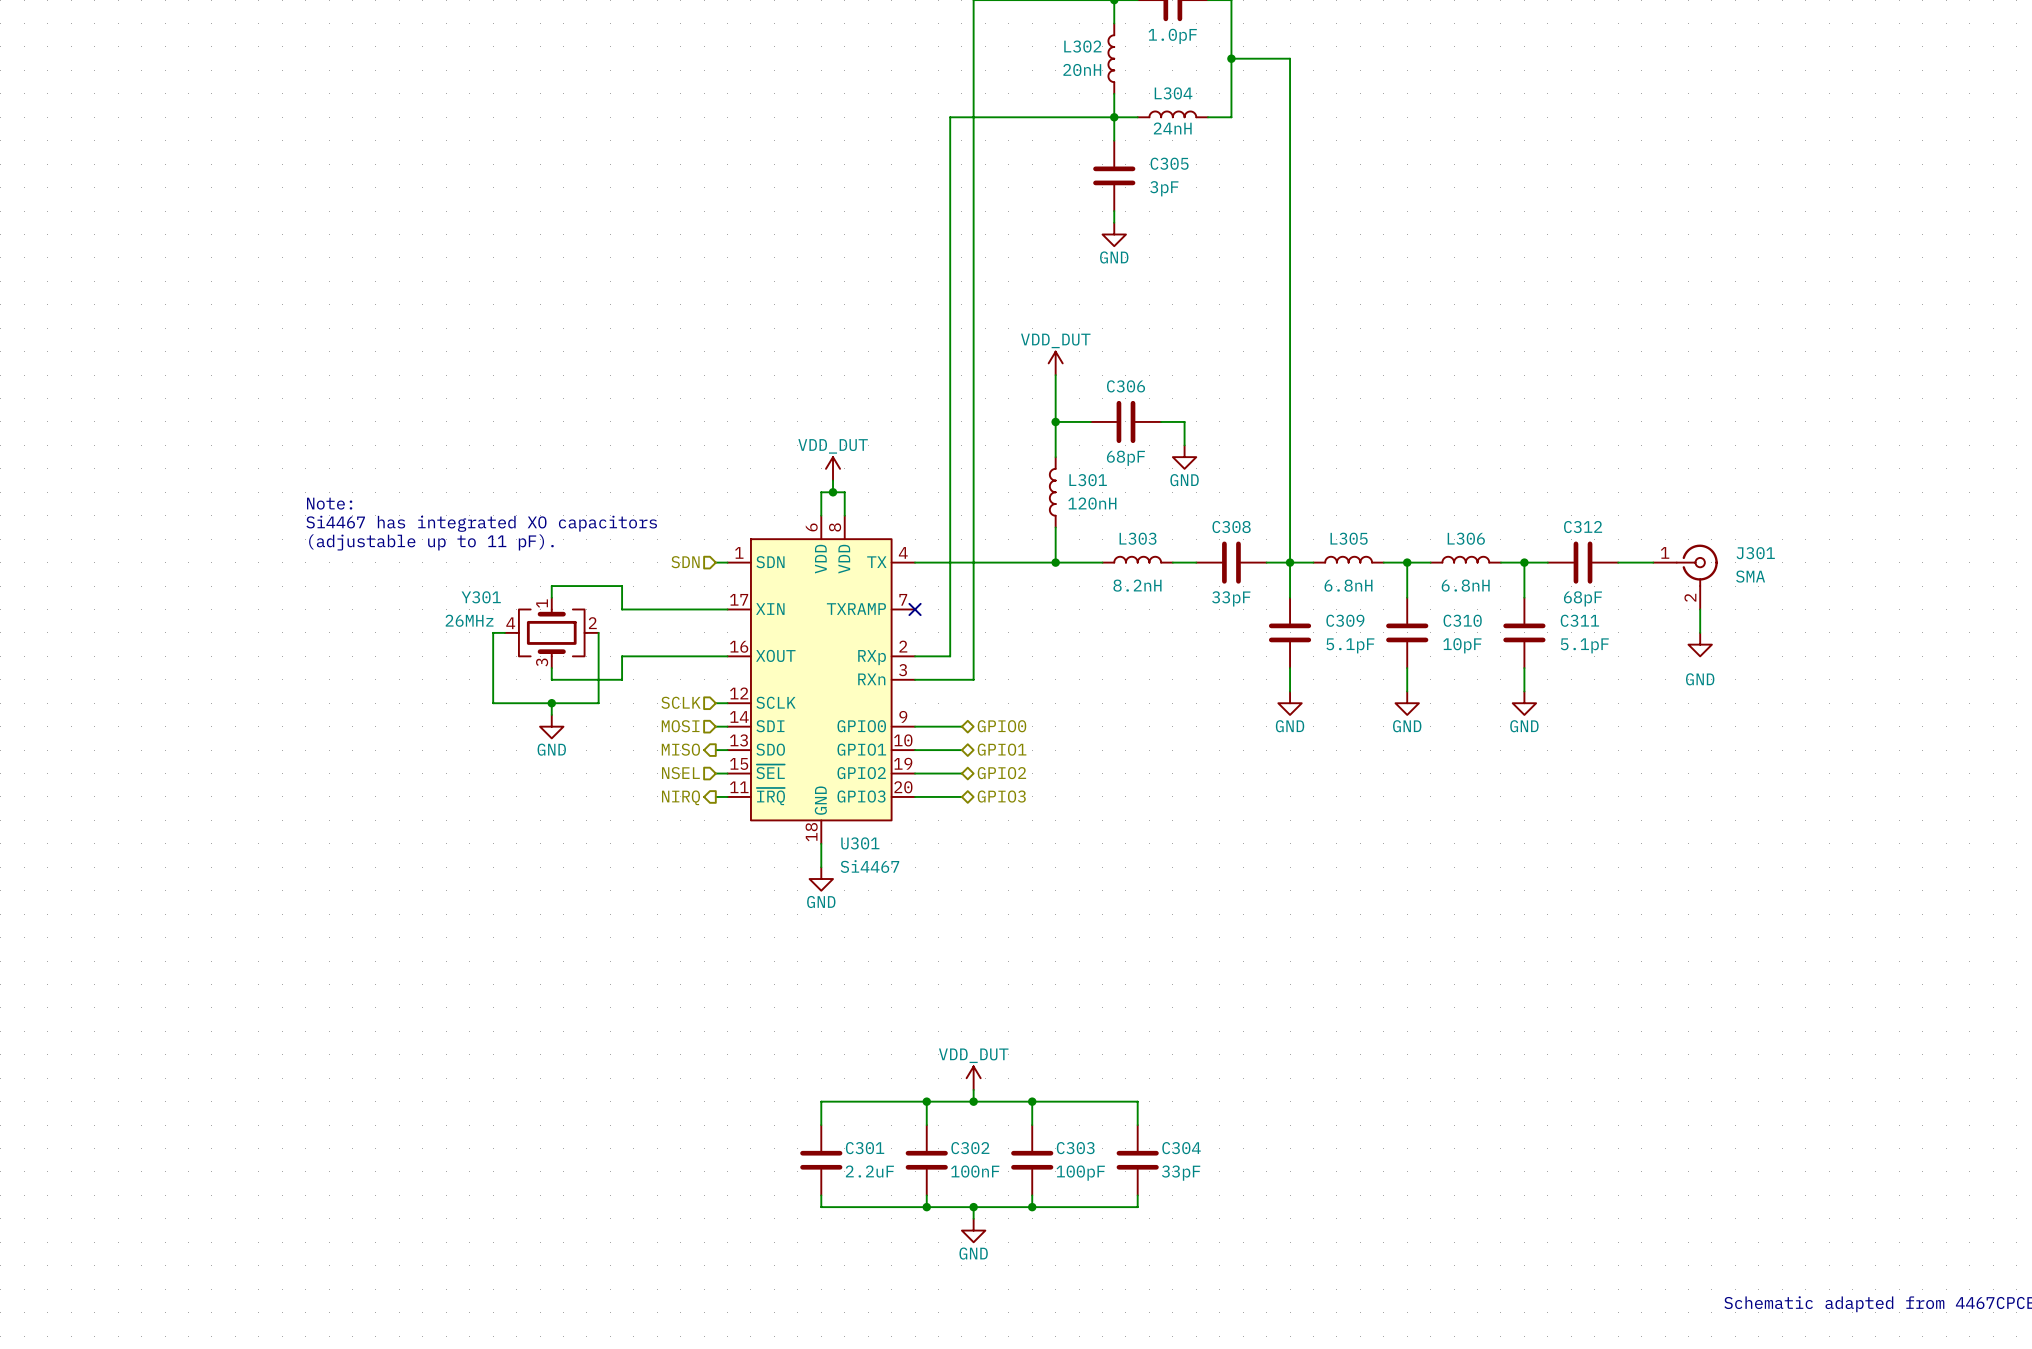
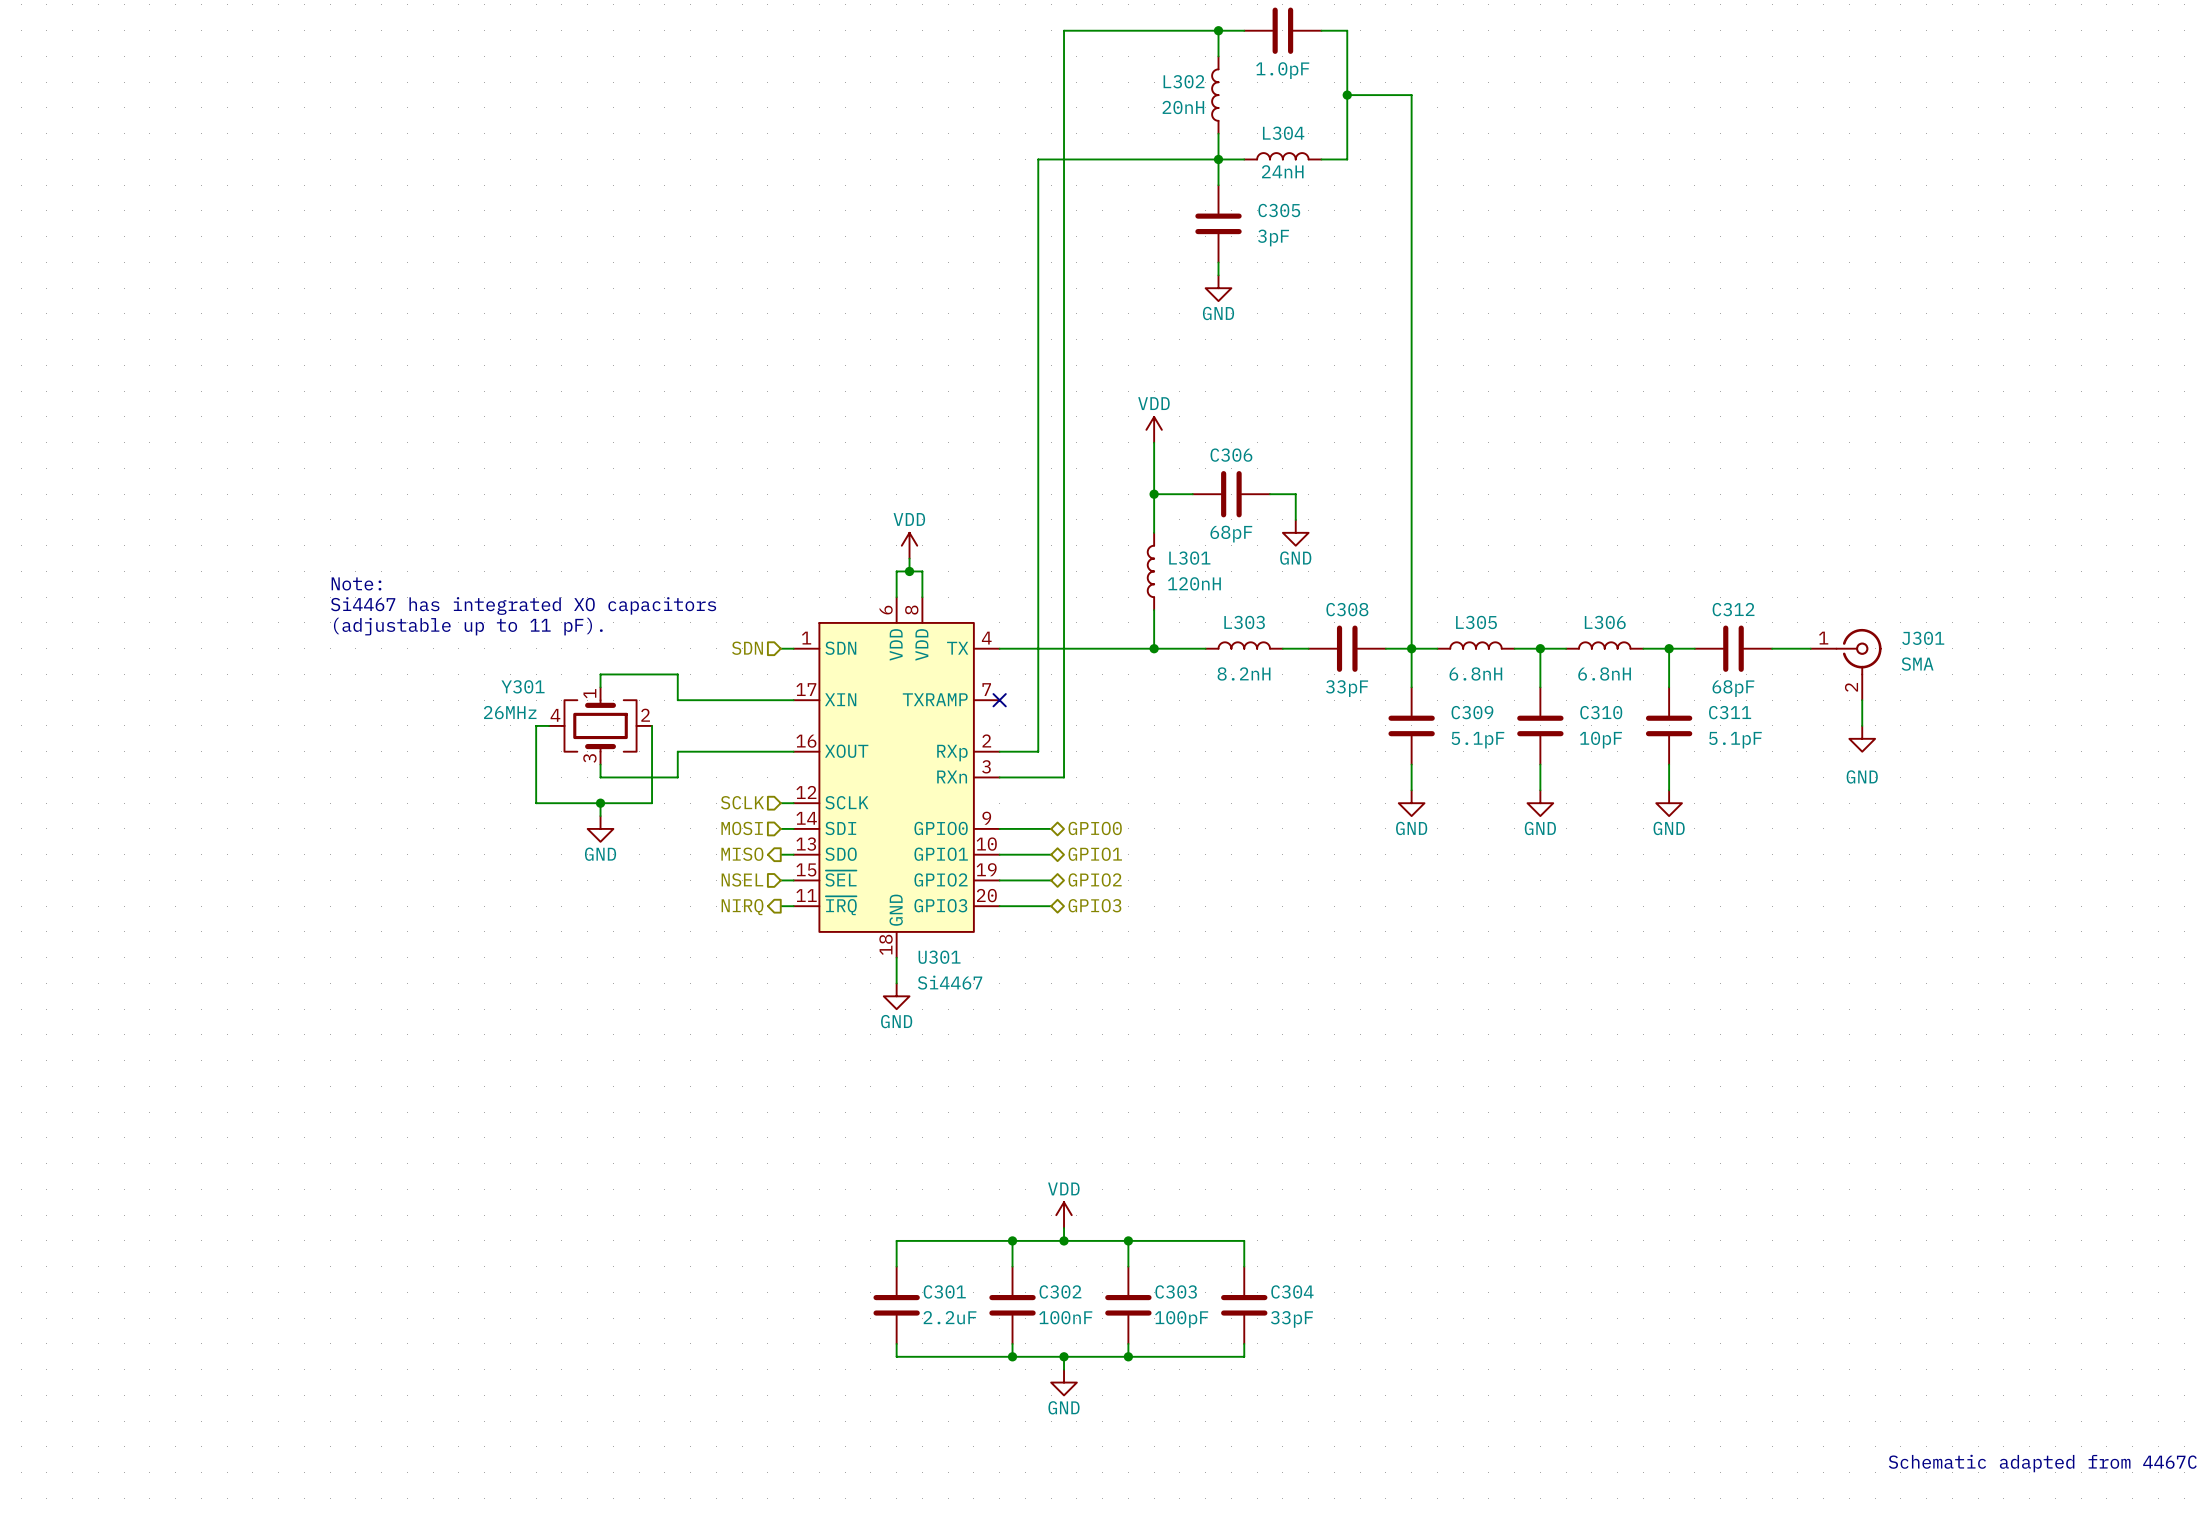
power symbol: VDD_DUT (1055, 363) -> VDD (1154, 429)
power symbol: VDD_DUT (833, 468) -> VDD (909, 545)
power symbol: VDD_DUT (973, 1078) -> VDD (1064, 1215)

